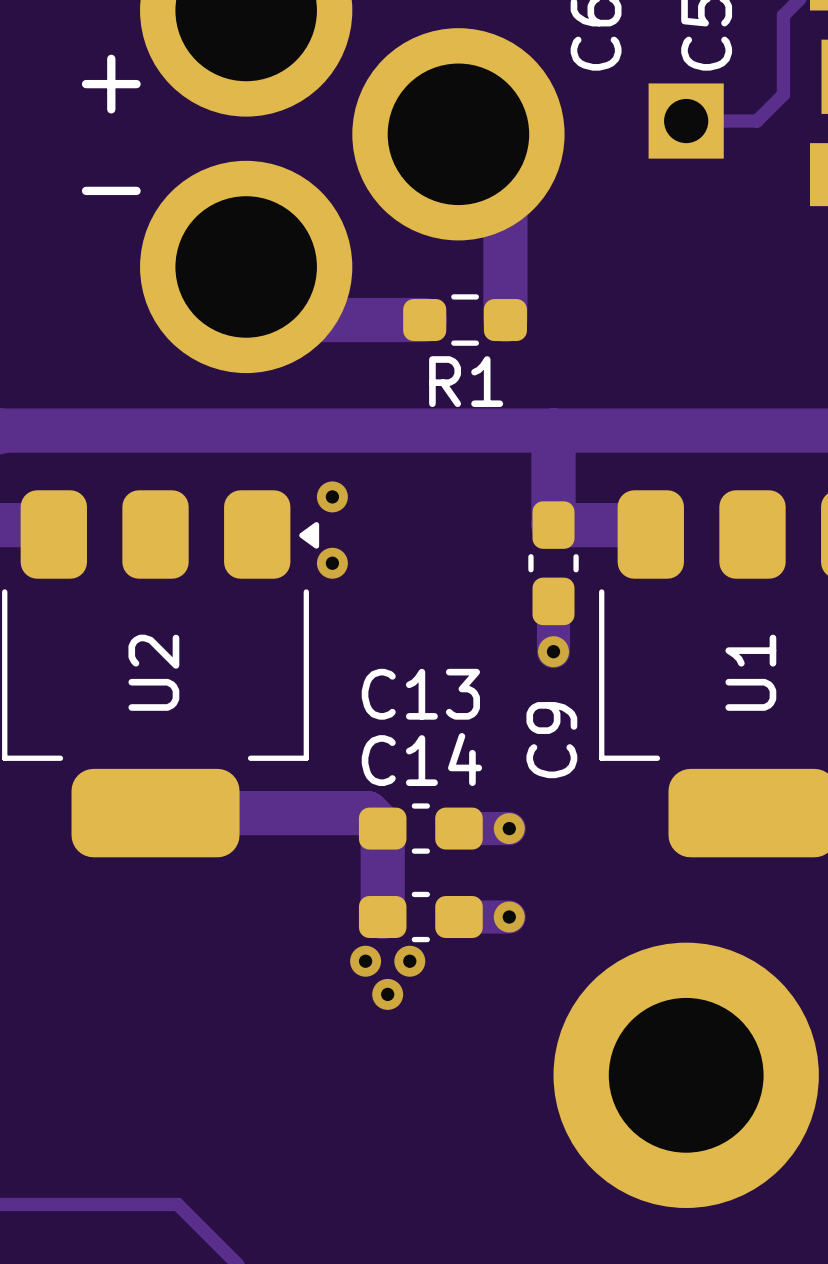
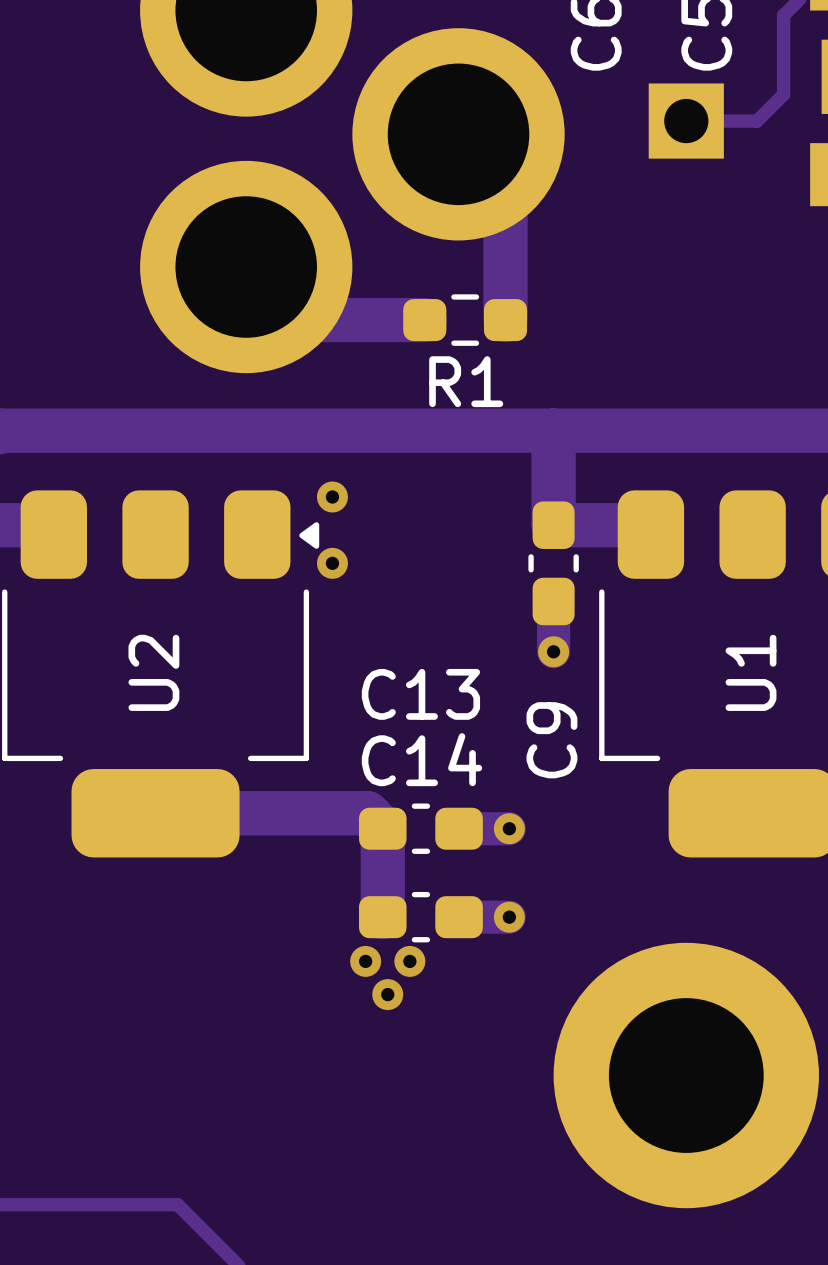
text: + (111, 84) -> none
text: - (111, 190) -> none

